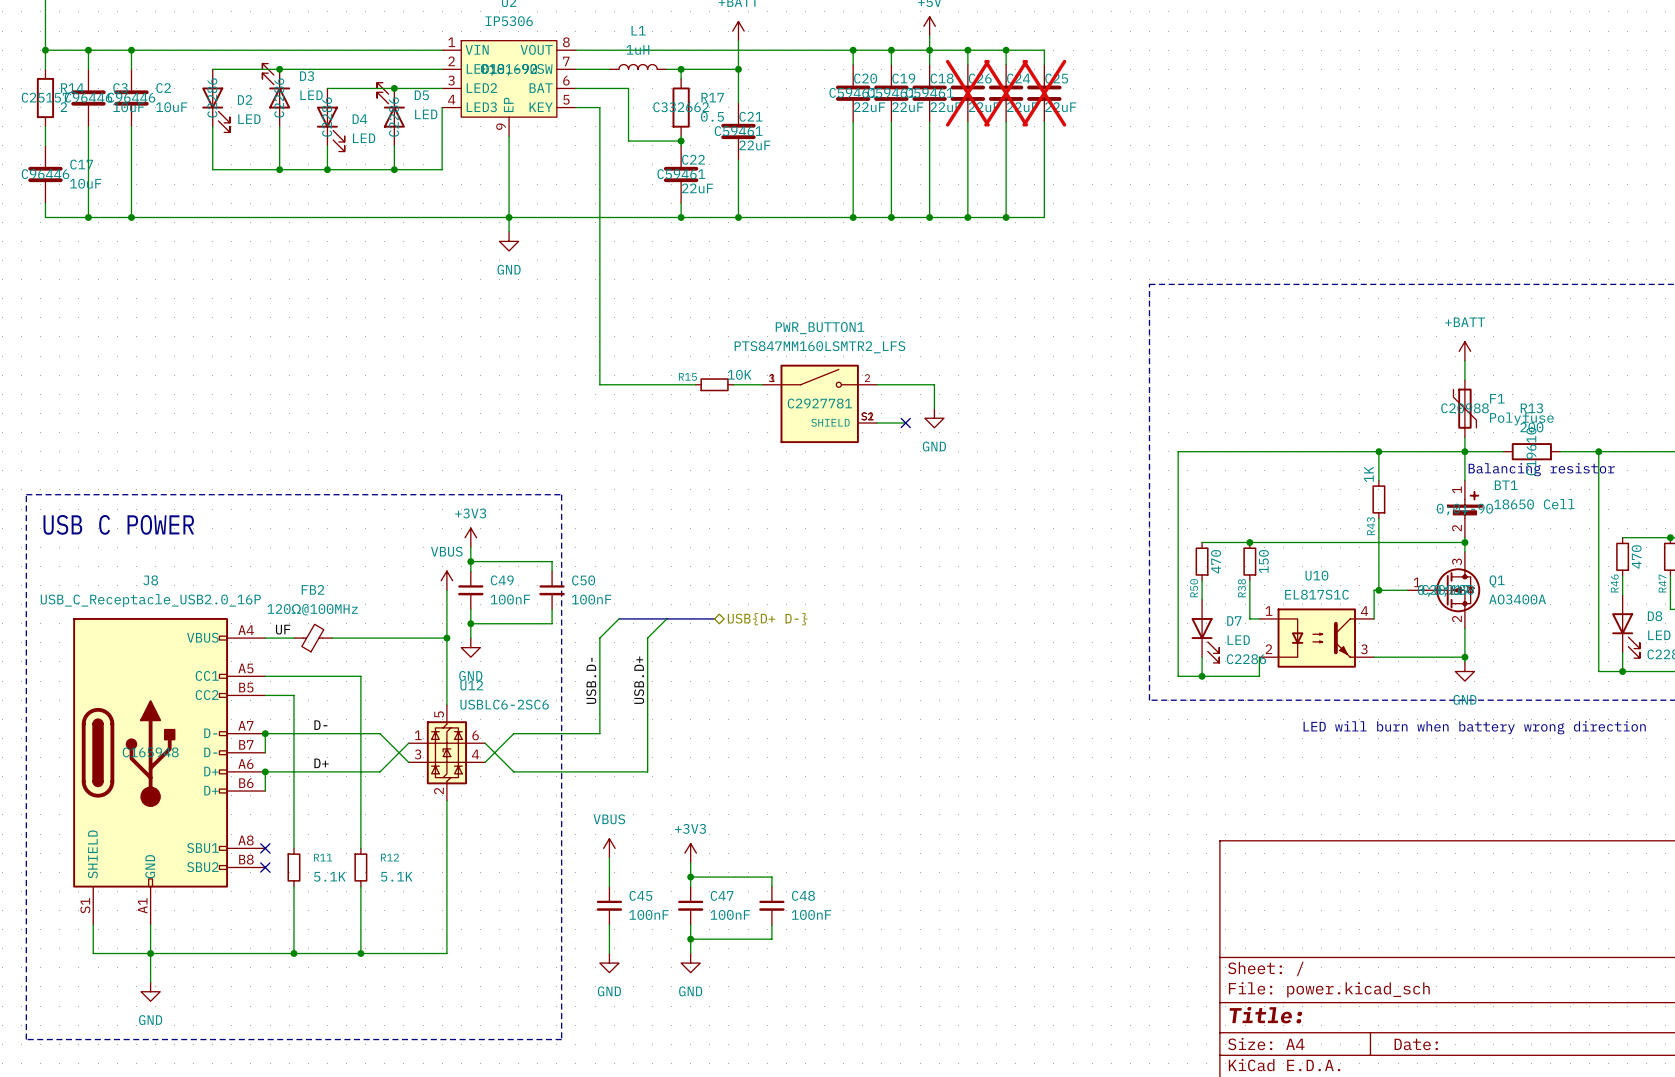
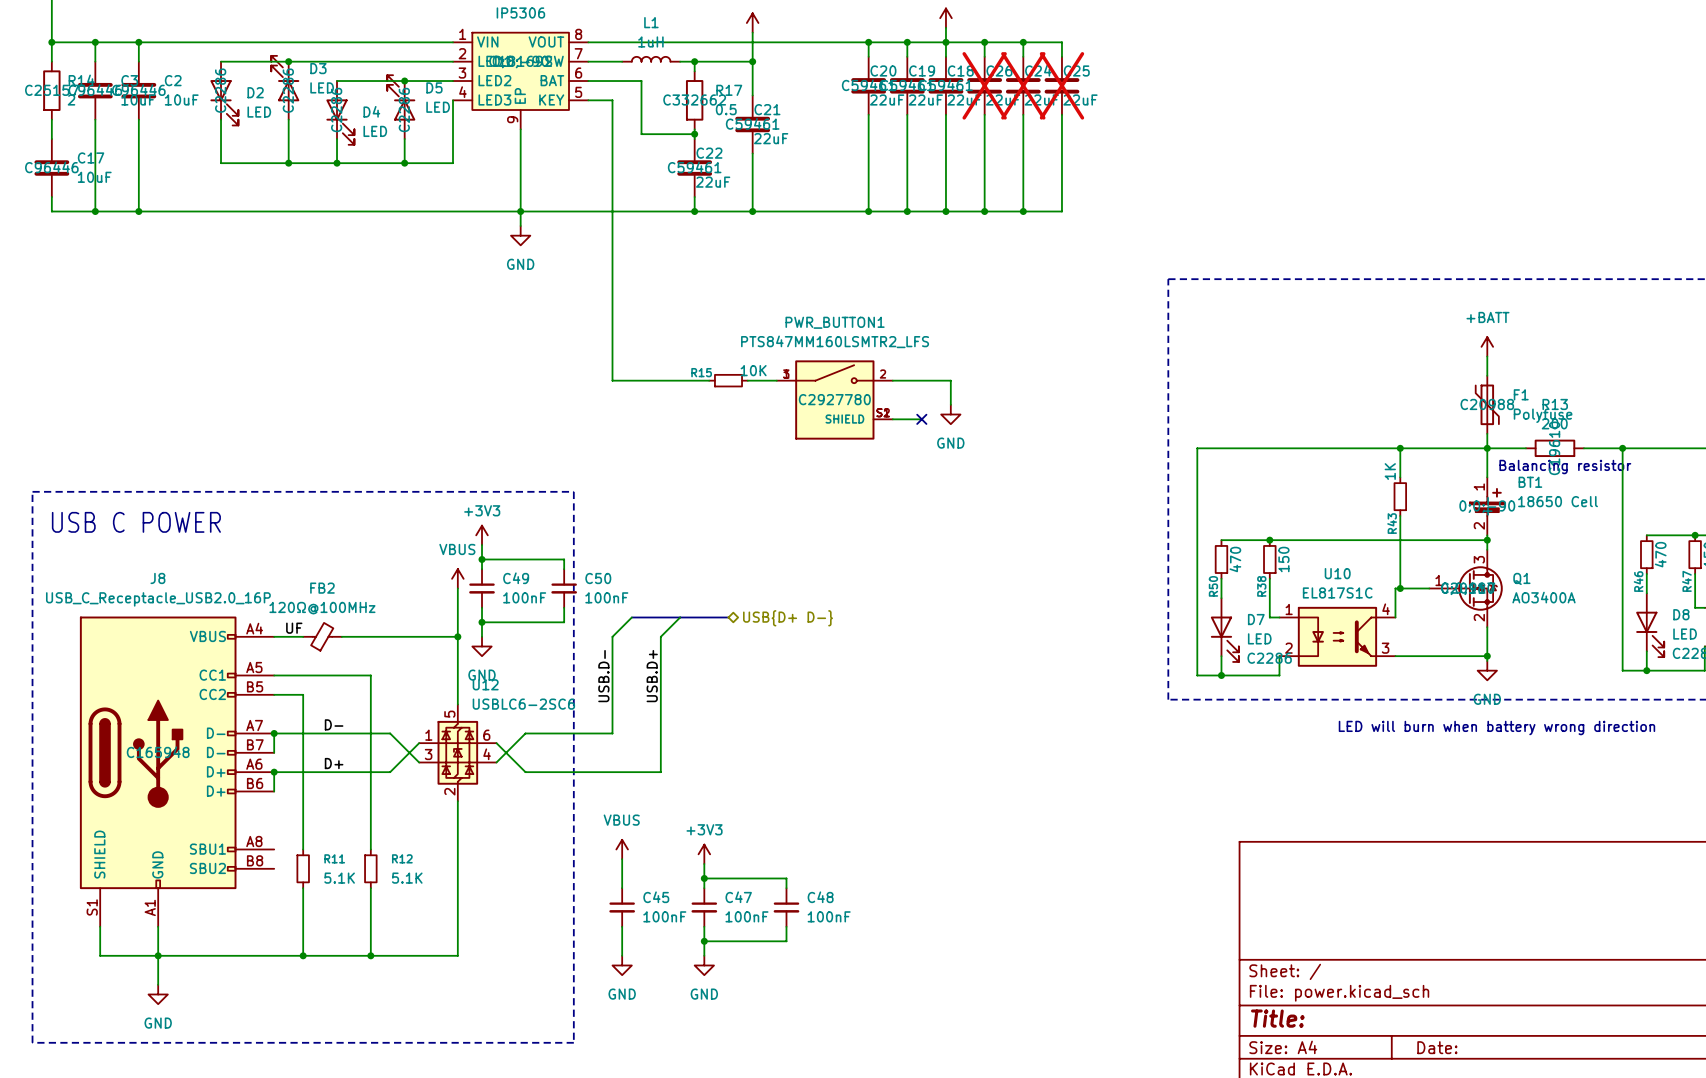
PWR_BUTTON1 text: C2927781 (819, 403) -> C2927780 (834, 399)
no-connect mark: (265, 848) -> none
no-connect mark: (265, 867) -> none

